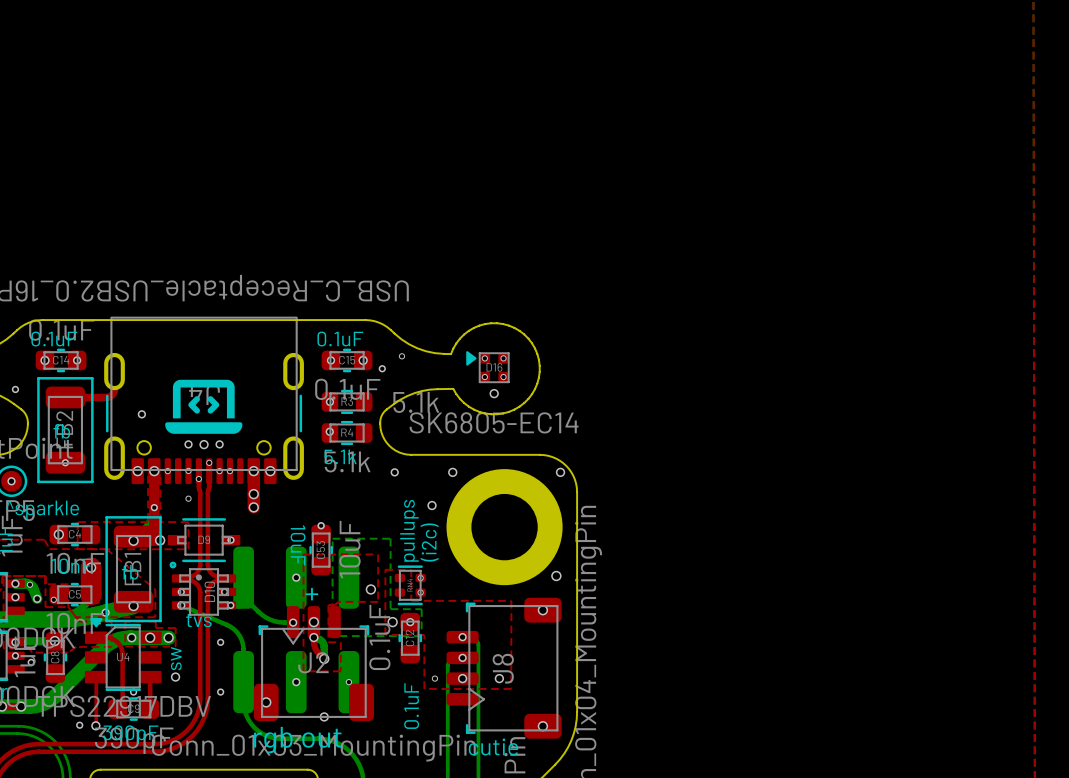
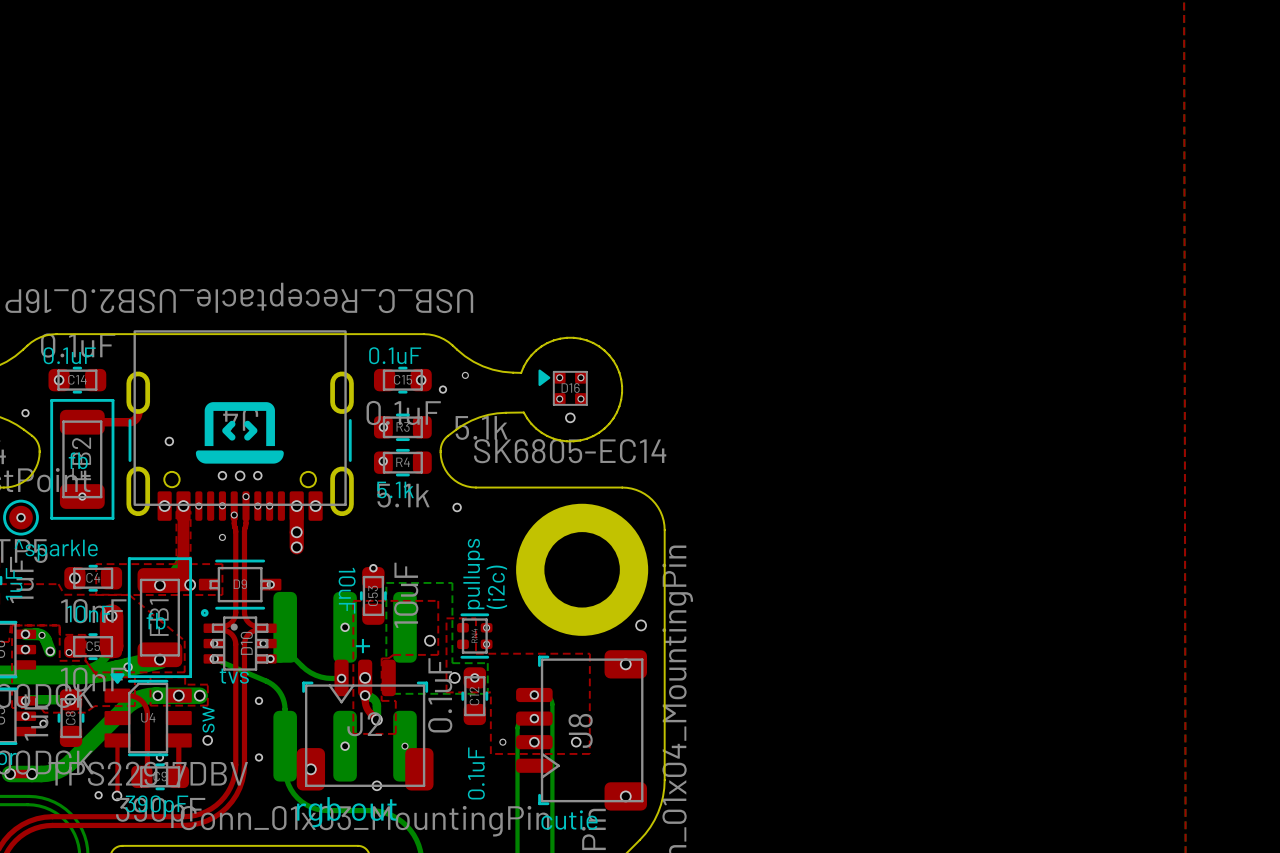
via: (77, 360) -> none
via: (330, 360) -> none
via: (452, 472) -> none
via: (560, 472) -> none
via: (432, 505) -> none
via: (154, 507) -> none

